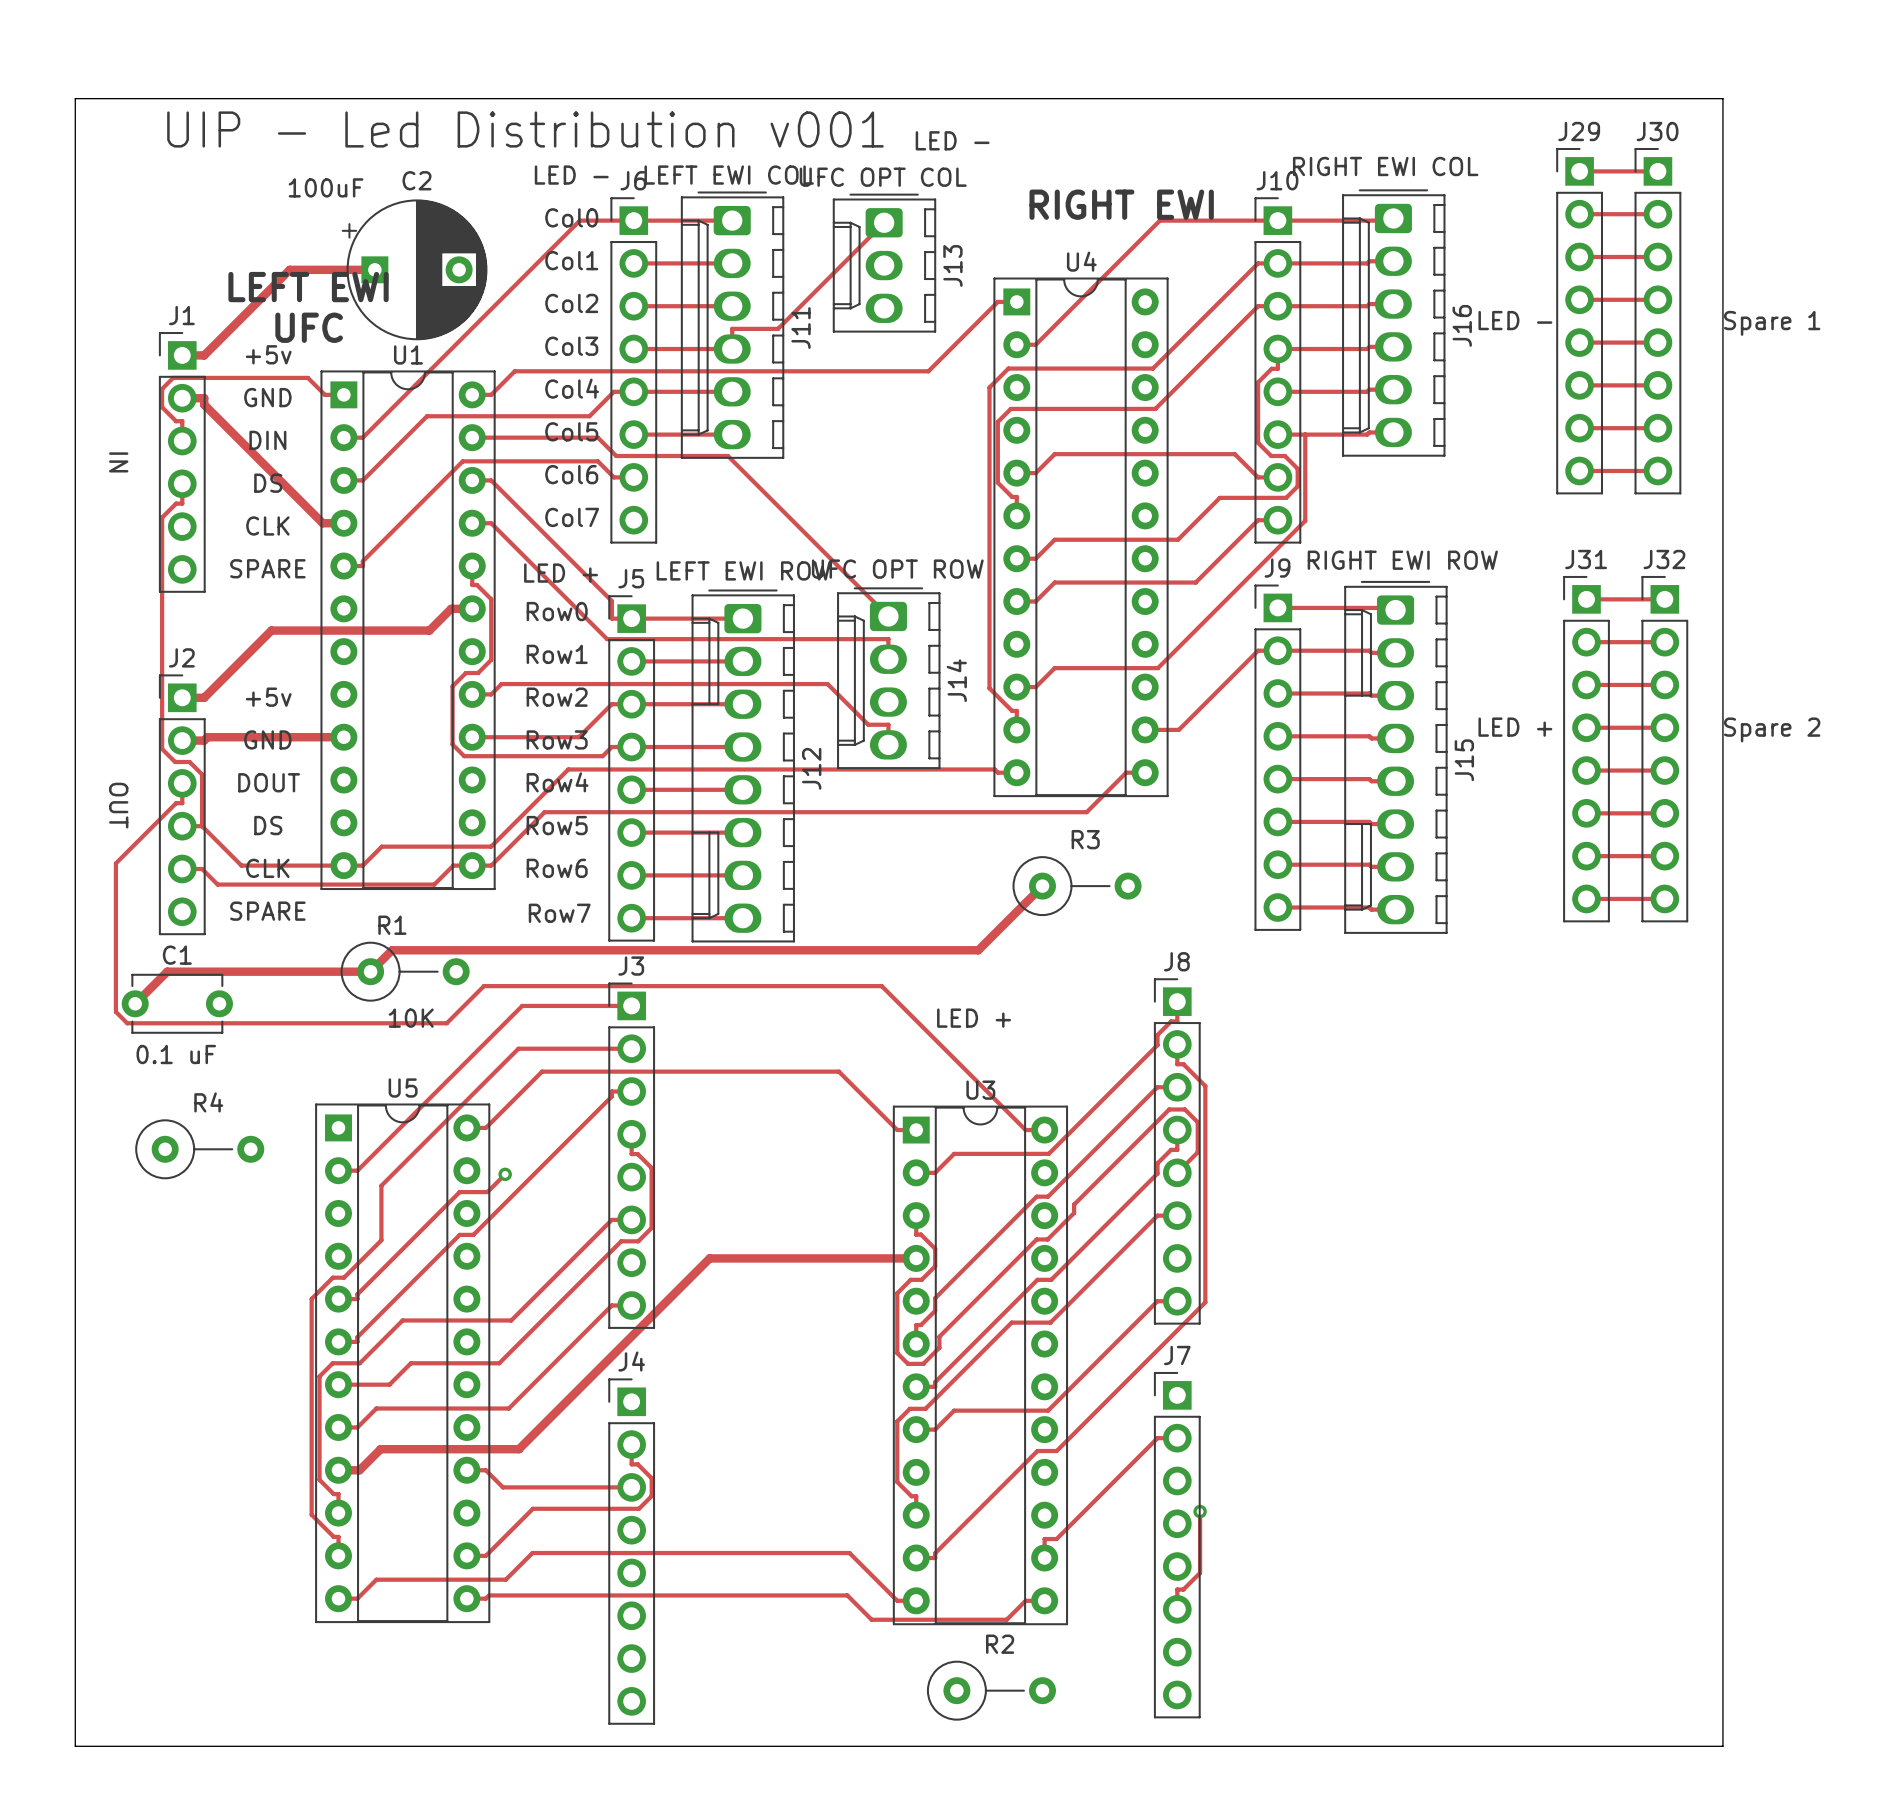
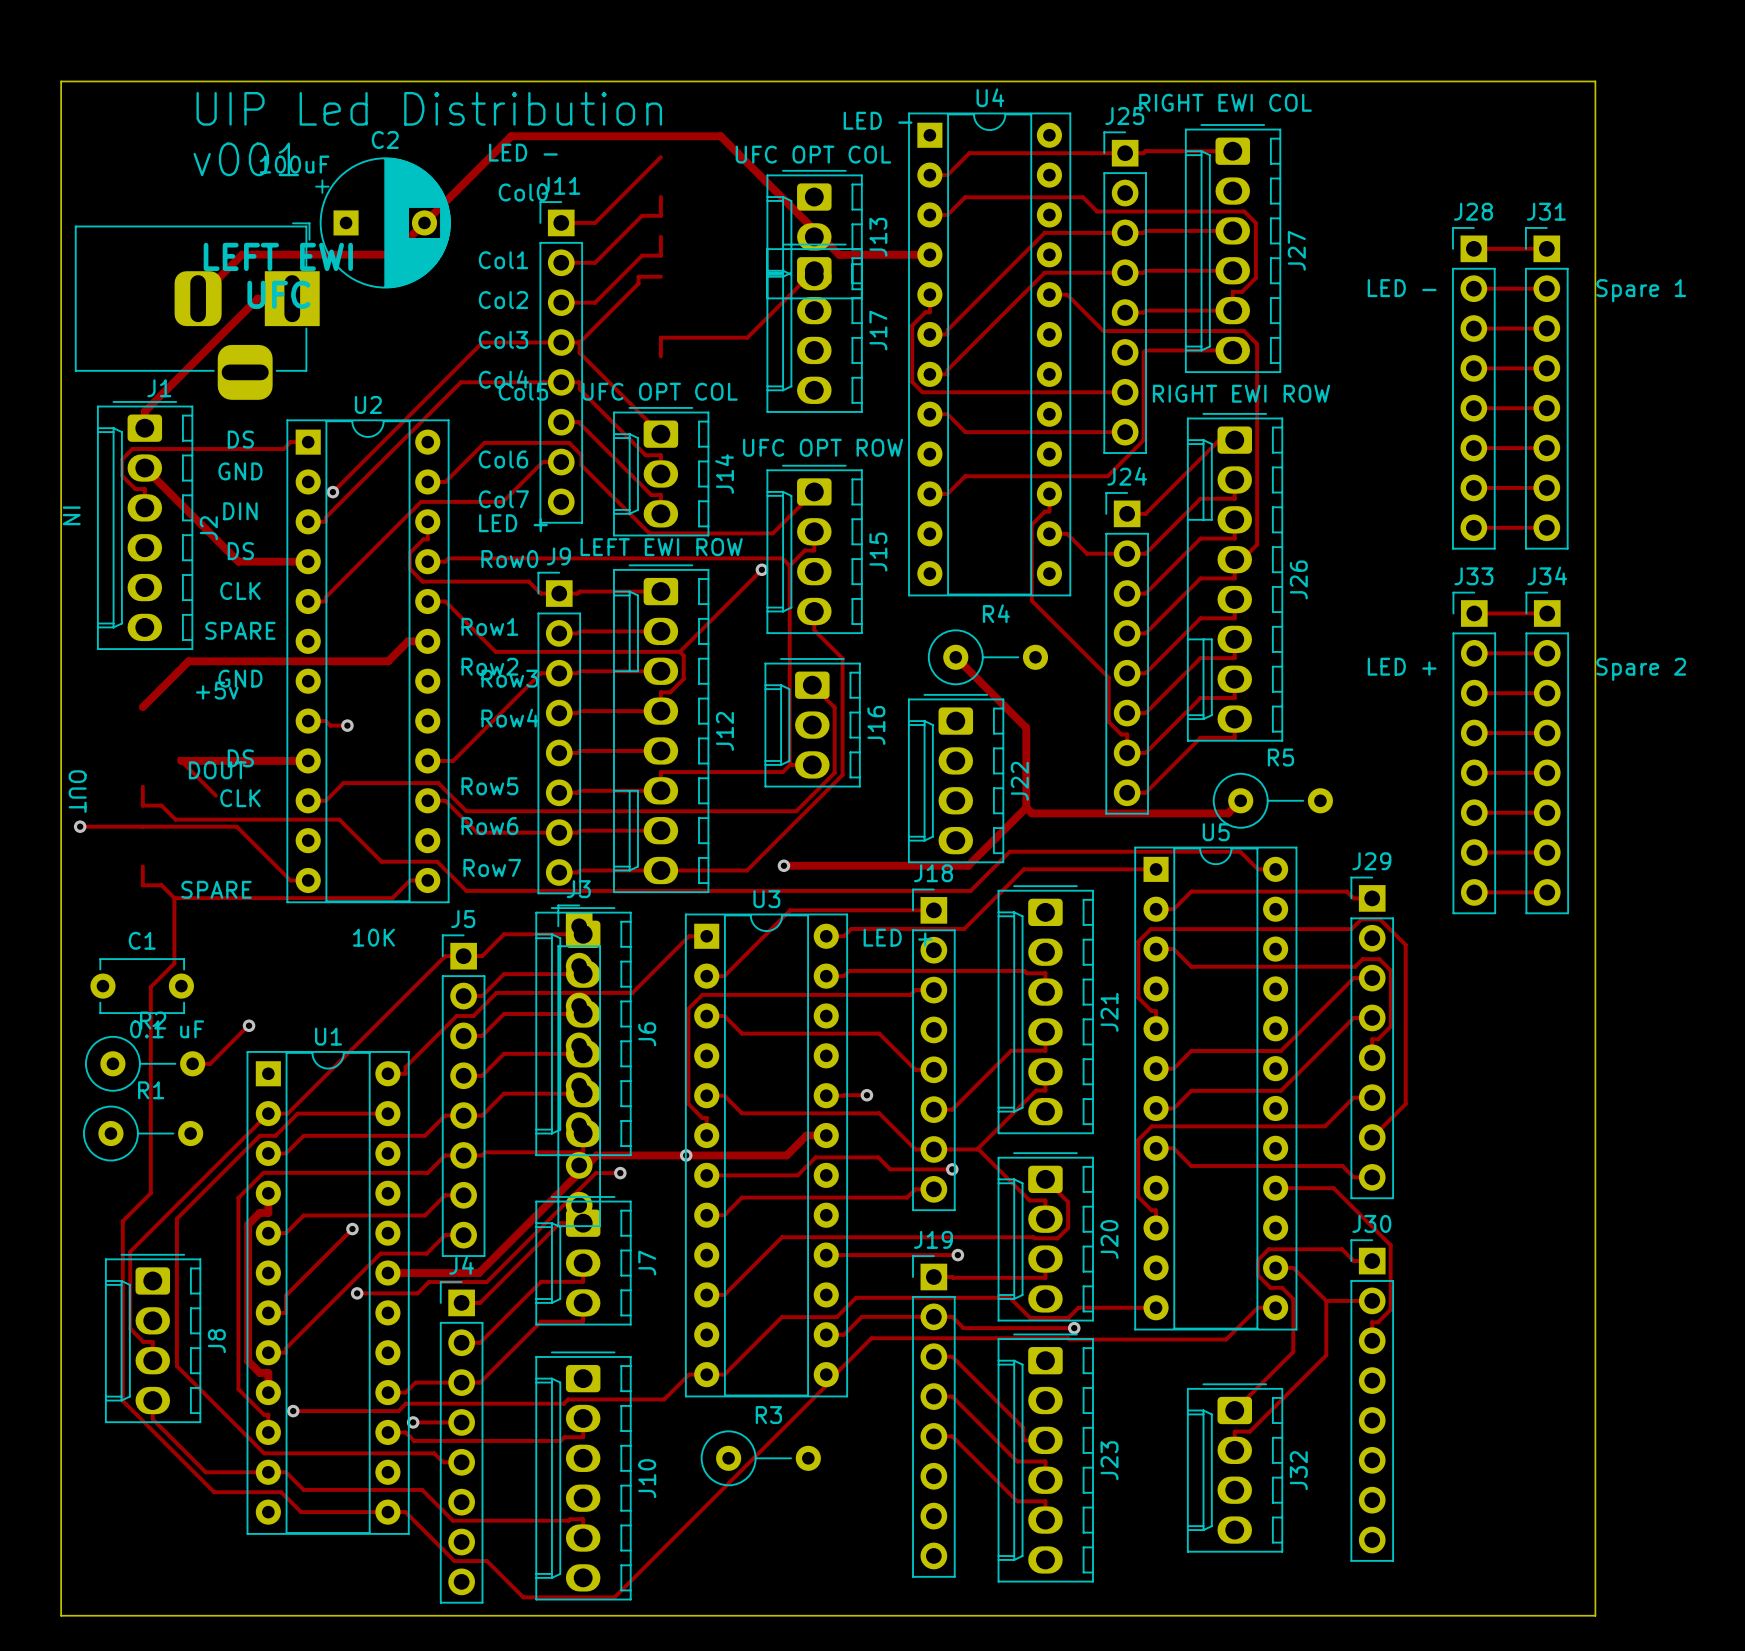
text: UIP - Led Distribution v001 (525, 129) -> UIP Led Distribution (429, 108)
J16 value: RIGHT EWI COL (1385, 166) -> none
track: (1579, 171) (1657, 171) -> (1473, 248) (1546, 248)
track: none -> (1232, 151) (969, 153) (947, 175) (929, 175)
J11 value: LEFT EWI COL (729, 175) -> none
track: none -> (660, 157) (595, 222) (561, 222)
J6 name position: J6 (633, 180) -> J6 (647, 1034)
J10 name position: J10 (1277, 180) -> J10 (647, 1478)
text: none -> v001 (246, 159)
J16 footprint: [1342, 189, 1446, 457] -> [764, 658, 861, 788]
J11 footprint: [680, 191, 785, 459] -> [539, 201, 584, 524]
J6 footprint: [610, 197, 658, 544] -> [535, 907, 632, 1157]
J10 footprint: [1254, 197, 1302, 544] -> [535, 1351, 632, 1601]
text: RIGHT EWI (1121, 204) -> none
track: (1579, 214) (1657, 214) -> (1473, 288) (1546, 288)
track: (1393, 218) (1391, 220) (1159, 220) (1035, 344) (1016, 344) -> none
track: (732, 220) (579, 220) (362, 437) (343, 437) -> none
track: none -> (660, 197) (660, 215) (642, 215) (595, 262) (561, 262)
track: (884, 222) (778, 328) (732, 328) (732, 349) (633, 349) -> none
track: none -> (929, 214) (947, 214) (965, 197) (1082, 197) (1097, 211) (1244, 211) (1255, 223) (1255, 278) (1242, 291) (1232, 291) (1232, 310) (1145, 310) (1143, 312) (1125, 312)
track: (1579, 256) (1657, 256) -> (1473, 328) (1546, 328)
track: none -> (1232, 230) (1044, 232) (947, 330) (947, 334) (929, 334)
text position: Col1 (571, 260) -> Col1 (503, 260)
track: (1393, 261) (1369, 261) (1367, 263) (1258, 263) (1152, 368) (1008, 368) (989, 387) (989, 688) (1012, 710) (1016, 710) (1016, 729) -> none
track: (633, 263) (732, 263) -> none
track: none -> (660, 236) (660, 255) (642, 255) (595, 302) (561, 302)
track: (374, 269) (289, 269) (204, 355) (182, 355) -> none
C2 position: (414, 269) -> (383, 222)
J27: none -> RIGHT EWI COL (1233, 248)
track: none -> (929, 254) (839, 254) (720, 136) (511, 136) (392, 254) (242, 254) (198, 298)
track: (1579, 299) (1657, 299) -> (1473, 368) (1546, 368)
track: none -> (814, 270) (747, 337) (660, 337) (660, 356)
track: (1016, 301) (997, 301) (928, 371) (514, 371) (491, 394) (472, 394) -> none
track: none -> (1232, 270) (1044, 272) (947, 369) (947, 374) (929, 374)
text position: Col2 (571, 303) -> Col2 (503, 300)
track: (1393, 304) (1369, 304) (1367, 306) (1258, 306) (1155, 408) (1010, 408) (997, 421) (997, 482) (1012, 496) (1016, 496) (1016, 515) -> none
track: (633, 306) (732, 306) -> none
track: none -> (660, 276) (638, 276) (638, 283) (579, 342) (482, 342) (332, 492)
J1 name position: J1 (181, 315) -> J1 (159, 388)
J29 position: (1579, 321) -> (1372, 1037)
J30 position: (1657, 321) -> (1372, 1400)
J25: none -> (1125, 292)
track: none -> (929, 294) (929, 312) (925, 312) (912, 325) (912, 381) (922, 392) (1125, 392)
track: none -> (1049, 294) (1067, 294) (1103, 331) (1244, 331) (1257, 344) (1257, 544) (1234, 567)
J11 name position: J11 (801, 328) -> J11 (560, 185)
track: none -> (292, 298) (257, 298) (144, 411) (144, 428)
J1 footprint: [158, 332, 206, 593] -> [74, 222, 320, 400]
track: (1579, 342) (1657, 342) -> (1473, 408) (1546, 408)
text position: Col3 (571, 346) -> Col3 (503, 339)
track: (1393, 346) (1369, 346) (1367, 349) (1277, 349) (1277, 368) (1271, 368) (1258, 382) (1258, 442) (1271, 456) (1284, 456) (1297, 468) (1297, 486) (1286, 497) (1219, 497) (1177, 539) (1054, 539) (1035, 558) (1016, 558) -> none
text: +5v (268, 354) -> none
J17: none -> (814, 328)
track: none -> (579, 342) (579, 352) (660, 434)
track: (1579, 385) (1657, 385) -> (1473, 448) (1546, 448)
track: none -> (1232, 350) (1145, 350) (1143, 352) (1143, 440) (1107, 476) (965, 476) (947, 493) (929, 493)
text position: Col4 (572, 388) -> Col4 (503, 379)
track: (1393, 389) (1369, 389) (1367, 391) (1277, 391) -> none
track: (732, 391) (613, 391) (589, 416) (427, 416) (362, 480) (343, 480) -> none
track: (343, 394) (324, 394) (307, 377) (173, 377) (162, 389) (162, 407) (176, 421) (182, 421) (182, 441) -> none
text position: GND (267, 397) -> GND (240, 471)
track: (182, 398) (204, 398) (204, 404) (322, 523) (343, 523) -> none
track: (1579, 428) (1657, 428) -> (1473, 487) (1546, 487)
J28: none -> (1473, 388)
track: (1393, 432) (1369, 432) (1367, 434) (1277, 434) -> none
track: (633, 434) (732, 434) -> none
track: (1305, 434) (1305, 520) (1157, 668) (1054, 668) (1035, 687) (1016, 687) -> none
track: (472, 437) (597, 437) (616, 456) (727, 456) (888, 616) -> none
text position: DIN (267, 440) -> DIN (240, 511)
track: none -> (929, 414) (947, 414) (965, 432) (1125, 432)
text position: IN (118, 462) -> IN (71, 515)
track: none -> (561, 422) (579, 422) (651, 495) (660, 495) (660, 513)
track: (1579, 470) (1657, 470) -> (1473, 527) (1546, 527)
track: (1016, 473) (1035, 473) (1054, 454) (1234, 454) (1258, 477) (1277, 477) -> none
text position: Col6 (571, 474) -> Col6 (503, 459)
track: (633, 477) (613, 477) (597, 461) (462, 461) (362, 561) (362, 566) (343, 566) -> none
track: (472, 480) (491, 480) (611, 601) (611, 618) (742, 618) -> none
track: (182, 483) (182, 503) (176, 503) (162, 517) (162, 749) (175, 761) (189, 761) (202, 774) (202, 826) (182, 826) -> none
track: none -> (1234, 440) (1219, 440) (1145, 513) (1127, 513)
track: none -> (308, 442) (290, 442) (283, 449) (132, 449) (122, 459) (122, 475) (135, 489) (144, 489) (144, 507)
track: none -> (561, 462) (542, 462) (502, 501) (421, 501) (325, 597) (325, 601) (308, 601)
track: none -> (144, 468) (238, 561) (308, 561)
text position: Col7 (572, 517) -> Col7 (503, 499)
track: none -> (660, 474) (660, 455) (645, 455) (579, 389) (579, 382) (460, 382) (325, 517) (325, 521) (308, 521)
track: (1277, 520) (1258, 520) (1195, 582) (1054, 582) (1035, 601) (1016, 601) -> none
track: (472, 523) (491, 523) (607, 639) (888, 639) (888, 659) -> none
text position: CLK (267, 525) -> CLK (240, 590)
track: none -> (1234, 479) (1234, 498) (1200, 498) (1145, 553) (1087, 553) (1067, 533) (1049, 533)
track: none -> (427, 481) (445, 481) (484, 442) (569, 442) (581, 455) (581, 465) (649, 533) (772, 533) (814, 491)
U4 position: (1081, 537) -> (989, 354)
via: none -> (332, 492)
track: none -> (1049, 493) (1049, 511) (1045, 511) (1031, 524) (1031, 600) (1108, 677) (1108, 721) (1121, 734) (1127, 734) (1127, 752) (1145, 752) (1200, 697) (1234, 697) (1234, 679)
J32 name position: J32 (1664, 559) -> J32 (1298, 1470)
J15 value: RIGHT EWI ROW (1402, 560) -> UFC OPT ROW (823, 447)
track: (472, 566) (472, 585) (477, 585) (491, 599) (491, 659) (478, 673) (465, 673) (452, 686) (452, 744) (464, 756) (602, 756) (611, 747) (742, 747) -> none
text: SPARE (267, 568) -> none
J14 value: UFC OPT ROW (897, 569) -> UFC OPT COL (660, 391)
track: none -> (1234, 519) (1234, 538) (1200, 538) (1145, 593) (1127, 593)
track: none -> (427, 521) (427, 539) (423, 539) (409, 552) (409, 568) (422, 581) (528, 581) (540, 593) (660, 591)
J32 footprint: [1641, 575, 1689, 923] -> [1186, 1383, 1284, 1553]
J15 footprint: [1344, 580, 1448, 934] -> [766, 464, 863, 635]
track: none -> (814, 531) (814, 550) (804, 550) (789, 565)
J14 footprint: [837, 587, 941, 770] -> [613, 407, 710, 537]
track: (1586, 599) (1664, 599) -> (1474, 613) (1547, 613)
text: none -> DS (240, 551)
track: (1277, 607) (1393, 607) (1395, 610) -> none
track: (472, 608) (451, 608) (429, 630) (271, 630) (204, 697) (182, 697) -> none
track: none -> (1234, 559) (1234, 578) (1200, 578) (1145, 633) (1127, 633)
track: none -> (427, 561) (445, 561) (448, 558) (782, 558) (789, 565)
track: none -> (789, 565) (789, 762) (791, 764)
track: none -> (761, 569) (679, 651)
via: none -> (761, 569)
U1 position: (408, 630) -> (328, 1292)
J26: none -> RIGHT EWI ROW (1235, 577)
track: (1586, 642) (1664, 642) -> (1474, 653) (1547, 653)
track: (1395, 652) (1371, 652) (1369, 650) (1258, 650) (1178, 729) (1145, 729) -> none
text position: Row1 (557, 654) -> Row1 (489, 626)
track: none -> (1234, 599) (1234, 618) (1200, 618) (1145, 673) (1127, 673)
J2 name position: J2 (181, 657) -> J2 (208, 528)
track: none -> (427, 601) (445, 601) (495, 651) (679, 651)
track: (631, 661) (742, 661) -> none
track: none -> (814, 611) (814, 630) (842, 658) (842, 774) (746, 870) (579, 870) (577, 872) (559, 872)
J2 footprint: [158, 674, 206, 936] -> [96, 401, 194, 651]
track: (1586, 684) (1664, 684) -> (1474, 693) (1547, 693)
text: none -> SPARE (240, 630)
track: none -> (660, 631) (579, 631) (577, 633) (559, 633)
track: (1277, 693) (1369, 693) (1371, 695) (1395, 695) -> none
track: (472, 694) (491, 694) (501, 684) (827, 684) (868, 724) (888, 724) (888, 744) -> none
text position: +5v (268, 697) -> +5v (217, 690)
text position: Row2 (557, 697) -> Row2 (489, 666)
track: none -> (1234, 639) (1234, 658) (1200, 658) (1145, 713) (1127, 713)
track: none -> (427, 641) (408, 641) (388, 661) (188, 661) (142, 707)
track: (742, 704) (611, 704) (578, 737) (472, 737) -> none
track: none -> (679, 651) (683, 655) (683, 678) (670, 692) (660, 692) (660, 711) (579, 711) (577, 713) (559, 713)
J24: none -> (1127, 653)
track: none -> (955, 657) (1026, 727) (1026, 807)
U2: none -> (367, 661)
track: (1586, 727) (1664, 727) -> (1474, 733) (1547, 733)
track: none -> (660, 671) (540, 673) (453, 760) (427, 760)
track: (1277, 736) (1369, 736) (1371, 738) (1395, 738) -> none
track: (343, 737) (207, 737) (204, 740) (182, 740) -> none
track: none -> (812, 685) (834, 707) (834, 772) (796, 811) (466, 811) (438, 783) (343, 783) (325, 800) (308, 800)
J31 position: (1586, 749) -> (1546, 388)
J9 position: (1277, 757) -> (559, 733)
J12 position: (743, 765) -> (661, 728)
J5 position: (631, 768) -> (463, 1095)
track: (1586, 770) (1664, 770) -> (1474, 772) (1547, 772)
track: (1016, 772) (997, 772) (994, 769) (568, 769) (491, 846) (381, 846) (362, 865) (241, 865) -> none
track: (1145, 772) (1126, 772) (1086, 812) (544, 812) (491, 865) (453, 865) (434, 884) (217, 884) (202, 868) (182, 868) -> none
track: (1277, 779) (1369, 779) (1371, 781) (1395, 781) -> none
text position: DOUT (269, 782) -> DOUT (217, 770)
track: (182, 783) (182, 803) (176, 803) (115, 863) (115, 1011) (127, 1023) (446, 1023) (483, 986) (881, 986) (1025, 1130) (1044, 1130) -> none
track: none -> (1234, 719) (1234, 737) (1200, 737) (1145, 792) (1127, 792)
track: none -> (308, 721) (325, 721) (330, 725) (347, 725)
track: (631, 789) (742, 789) -> none
via: none -> (347, 725)
text position: OUT (118, 805) -> OUT (77, 791)
track: (1586, 813) (1664, 813) -> (1474, 812) (1547, 812)
track: none -> (660, 750) (579, 750) (577, 752) (559, 752)
J33: none -> (1474, 752)
J34: none -> (1547, 752)
track: (1277, 821) (1369, 821) (1371, 824) (1395, 824) -> none
text position: Row5 (557, 825) -> Row5 (489, 786)
track: none -> (181, 760) (308, 760)
track: (631, 832) (742, 832) -> none
track: none -> (812, 764) (789, 764) (782, 772) (660, 772) (660, 790) (579, 790) (577, 792) (559, 792)
J22: none -> (956, 778)
track: none -> (142, 786) (142, 805) (161, 805) (175, 819) (339, 819) (381, 861) (437, 861) (466, 890) (970, 890) (1009, 851) (1240, 851) (1257, 869) (1275, 869)
track: (1586, 856) (1664, 856) -> (1474, 852) (1547, 852)
track: (1277, 864) (1369, 864) (1371, 866) (1395, 866) -> none
text position: Row6 (557, 868) -> Row6 (489, 826)
track: none -> (427, 800) (445, 800) (477, 832) (660, 830)
track: none -> (1240, 800) (1228, 813) (1031, 813) (1026, 807)
R5: none -> (1272, 800)
track: (631, 875) (742, 875) -> none
track: none -> (1026, 807) (968, 865) (783, 865)
track: (1042, 886) (978, 950) (392, 950) (370, 971) (167, 971) (135, 1003) -> none
R3 position: (1077, 886) -> (760, 1458)
track: none -> (80, 826) (236, 826) (290, 880) (308, 880)
via: none -> (80, 826)
track: (1586, 898) (1664, 898) -> (1474, 892) (1547, 892)
track: (1277, 907) (1369, 907) (1371, 909) (1395, 909) -> none
text position: SPARE (267, 911) -> SPARE (216, 889)
text position: Row7 (559, 913) -> Row7 (492, 867)
track: (631, 918) (742, 918) -> none
R1 name position: R1 (392, 925) -> R1 (151, 1090)
via: none -> (783, 865)
track: none -> (142, 866) (142, 885) (161, 885) (174, 898)
track: none -> (1156, 869) (1023, 869) (964, 928) (851, 928) (843, 936) (826, 936)
track: none -> (427, 880) (410, 880) (392, 898) (174, 898)
J8 name position: J8 (1176, 961) -> J8 (216, 1341)
R1 position: (405, 971) -> (143, 1133)
track: none -> (174, 898) (174, 963) (150, 987) (150, 1193) (122, 1221) (122, 1400) (214, 1492) (281, 1492) (301, 1512) (405, 1512) (454, 1561) (487, 1561) (523, 1597) (614, 1597) (871, 1338) (1226, 1339) (1257, 1307) (1275, 1307)
track: none -> (1372, 898) (1353, 898) (1346, 891) (1191, 891) (1173, 909) (1156, 909)
J8 footprint: [1153, 978, 1201, 1325] -> [104, 1253, 202, 1424]
track: none -> (933, 910) (790, 910) (724, 976) (706, 976)
track: (1177, 1001) (1177, 1021) (1171, 1021) (1157, 1035) (1157, 1045) (1048, 1153) (954, 1153) (935, 1172) (916, 1172) -> none
C1 position: (177, 1003) -> (142, 986)
track: (631, 1005) (522, 1005) (357, 1170) (338, 1170) -> none
track: none -> (583, 934) (503, 934) (482, 956) (445, 956) (287, 1113) (268, 1113) (130, 1251) (130, 1328) (143, 1341) (152, 1341) (152, 1360)
track: none -> (706, 936) (689, 936) (632, 992) (496, 992) (473, 1015) (456, 1015) (405, 1067) (405, 1073) (387, 1073)
track: none -> (1156, 949) (1173, 949) (1191, 966) (1355, 966) (1362, 959) (1379, 959) (1390, 970) (1390, 1026) (1377, 1039) (1372, 1039) (1372, 1057)
track: (1177, 1044) (1177, 1064) (1183, 1064) (1205, 1086) (1205, 1302) (1056, 1451) (1037, 1451) (935, 1553) (935, 1558) (916, 1558) -> none
track: (631, 1048) (518, 1048) (381, 1185) (381, 1240) (344, 1277) (332, 1277) (311, 1298) (311, 1514) (333, 1536) (338, 1536) (338, 1555) -> none
text position: 0.1 uF (176, 1054) -> 0.1 uF (167, 1029)
track: none -> (583, 974) (503, 974) (482, 996) (463, 996)
track: none -> (826, 976) (843, 976) (849, 970) (1024, 970) (1026, 973) (1045, 973) (1045, 992)
track: none -> (1372, 978) (1353, 978) (1280, 1050) (1191, 1050) (1173, 1068) (1156, 1068)
track: none -> (933, 990) (915, 990) (910, 994) (702, 994) (688, 1008) (688, 1103) (702, 1117) (706, 1117) (706, 1135)
track: (1177, 1087) (1157, 1087) (1048, 1196) (1036, 1196) (935, 1298) (935, 1310) (920, 1325) (916, 1325) (916, 1344) -> none
track: (631, 1091) (611, 1091) (611, 1096) (473, 1234) (459, 1234) (357, 1337) (357, 1341) (338, 1341) -> none
J21: none -> (1045, 1009)
track: none -> (583, 1013) (503, 1013) (482, 1035) (463, 1035)
track: none -> (706, 1015) (724, 1015) (742, 1033) (879, 1033) (915, 1069) (933, 1069)
track: none -> (1372, 1017) (1353, 1017) (1280, 1090) (1191, 1090) (1173, 1108) (1156, 1108)
track: none -> (249, 1025) (210, 1063) (192, 1063)
via: none -> (249, 1025)
track: none -> (1156, 1028) (1156, 1011) (1151, 1011) (1138, 997) (1138, 941) (1150, 929) (1351, 929) (1361, 919) (1380, 919) (1405, 944) (1405, 1104) (1372, 1137)
track: none -> (1045, 1031) (1045, 1050) (1011, 1050) (952, 1109) (933, 1109)
track: (466, 1127) (485, 1127) (542, 1071) (838, 1071) (897, 1130) (916, 1130) -> none
track: (1177, 1130) (1177, 1149) (1171, 1149) (1157, 1163) (1157, 1173) (1051, 1279) (1037, 1279) (935, 1382) (935, 1386) (916, 1386) -> none
track: (631, 1134) (631, 1154) (637, 1154) (651, 1167) (651, 1228) (638, 1241) (621, 1241) (499, 1363) (410, 1363) (389, 1384) (338, 1384) -> none
J18: none -> (933, 1049)
track: none -> (583, 1053) (503, 1053) (482, 1075) (463, 1075)
R4 position: (199, 1149) -> (987, 657)
track: none -> (1045, 1071) (1045, 1090) (1036, 1090) (977, 1149) (915, 1149) (879, 1113) (742, 1113) (724, 1095) (706, 1095)
track: (1177, 1172) (1197, 1152) (1197, 1122) (1184, 1109) (1169, 1109) (1074, 1204) (1074, 1213) (1047, 1239) (1036, 1239) (939, 1336) (939, 1347) (923, 1363) (907, 1363) (897, 1353) (897, 1293) (910, 1279) (921, 1279) (935, 1266) (935, 1248) (920, 1234) (916, 1234) (916, 1215) -> none
track: (505, 1174) (487, 1192) (459, 1192) (357, 1294) (357, 1299) (338, 1299) -> none
via: (505, 1174) -> none
track: none -> (583, 1093) (503, 1093) (482, 1115) (445, 1115) (424, 1135) (303, 1135) (286, 1153) (268, 1153)
track: none -> (866, 1095) (826, 1095)
via: none -> (866, 1095)
track: none -> (1372, 1097) (1353, 1097) (1325, 1126) (1151, 1126) (1138, 1139) (1138, 1196) (1151, 1210) (1156, 1210) (1156, 1228)
track: none -> (387, 1113) (297, 1113) (275, 1135) (259, 1135) (176, 1218) (176, 1366) (264, 1453) (434, 1453) (443, 1462) (461, 1462)
track: (1177, 1215) (1157, 1215) (1050, 1322) (1011, 1322) (925, 1408) (909, 1408) (897, 1421) (897, 1482) (911, 1496) (916, 1496) (916, 1515) -> none
track: (631, 1219) (611, 1219) (511, 1320) (402, 1320) (359, 1363) (332, 1363) (319, 1376) (319, 1479) (333, 1494) (338, 1494) (338, 1513) -> none
track: none -> (583, 1133) (583, 1152) (485, 1152) (482, 1155) (445, 1155) (427, 1172) (263, 1172) (238, 1197) (238, 1389) (263, 1414) (268, 1414) (268, 1432)
track: none -> (826, 1135) (806, 1135) (786, 1155) (596, 1155) (478, 1273) (387, 1273)
track: none -> (977, 1148) (1029, 1200) (1045, 1200) (1045, 1219)
track: none -> (1156, 1148) (1173, 1148) (1191, 1165) (1342, 1165) (1353, 1177) (1372, 1177)
via: none -> (686, 1155)
track: (916, 1258) (709, 1258) (518, 1449) (380, 1449) (359, 1470) (338, 1470) -> none
track: none -> (952, 1169) (890, 1169) (878, 1157) (815, 1157) (797, 1175) (706, 1175)
via: none -> (952, 1169)
track: none -> (620, 1173) (595, 1173) (486, 1282) (428, 1282) (417, 1293) (357, 1293)
via: none -> (620, 1173)
track: none -> (1045, 1179) (1068, 1202) (1068, 1227) (1057, 1238) (782, 1237) (724, 1294) (706, 1294)
track: none -> (1275, 1188) (1333, 1188) (1390, 1245) (1390, 1309) (1377, 1322) (1372, 1322) (1372, 1340)
track: none -> (933, 1189) (915, 1189) (907, 1197) (742, 1197) (724, 1215) (706, 1215)
track: none -> (268, 1193) (268, 1212) (259, 1212) (248, 1224) (248, 1361) (259, 1372) (268, 1372) (268, 1392)
track: none -> (463, 1195) (445, 1195) (424, 1215) (303, 1215) (286, 1233) (268, 1233)
track: (1177, 1301) (1157, 1301) (1048, 1410) (954, 1410) (935, 1429) (916, 1429) -> none
track: (631, 1305) (611, 1305) (508, 1408) (376, 1408) (357, 1427) (338, 1427) -> none
track: none -> (583, 1223) (559, 1223) (480, 1302) (461, 1302)
track: none -> (352, 1229) (286, 1295) (286, 1312) (268, 1312)
via: none -> (352, 1229)
track: none -> (463, 1235) (445, 1235) (426, 1253) (380, 1253) (286, 1348) (286, 1352) (268, 1352)
J20: none -> (1045, 1236)
J7 name position: J7 (1177, 1355) -> J7 (647, 1263)
track: none -> (826, 1255) (957, 1255)
via: none -> (957, 1255)
U5 position: (402, 1363) -> (1215, 1088)
track: none -> (1045, 1259) (1045, 1277) (933, 1277)
U3 position: (980, 1365) -> (766, 1155)
track: none -> (1372, 1261) (1353, 1261) (1342, 1249) (1268, 1249) (1257, 1260) (1257, 1275) (1270, 1287) (1282, 1287) (1293, 1299) (1293, 1351) (1234, 1410)
track: none -> (583, 1263) (583, 1281) (541, 1281) (480, 1342) (461, 1342)
J7 footprint: [1153, 1371, 1201, 1719] -> [535, 1196, 632, 1326]
track: none -> (1275, 1267) (1293, 1267) (1326, 1300)
via: none -> (357, 1293)
track: none -> (1326, 1300) (1372, 1300)
track: none -> (1326, 1300) (1326, 1355) (1249, 1431) (1234, 1431) (1234, 1450)
track: none -> (583, 1302) (583, 1321) (541, 1321) (480, 1382) (415, 1382) (405, 1392) (387, 1392)
track: none -> (1156, 1307) (1078, 1307) (1068, 1317) (1030, 1317) (1009, 1297) (856, 1297) (836, 1317) (781, 1317) (724, 1374) (689, 1374) (664, 1399) (568, 1399) (563, 1403) (405, 1403) (398, 1411) (293, 1411)
track: none -> (1074, 1328) (963, 1328) (952, 1316) (861, 1316) (843, 1334) (826, 1334)
track: (1177, 1438) (1157, 1438) (1056, 1539) (1044, 1539) (1044, 1558) -> none
track: (631, 1444) (631, 1464) (637, 1464) (651, 1478) (651, 1496) (639, 1508) (532, 1508) (485, 1555) (466, 1555) -> none
track: none -> (933, 1356) (952, 1356) (1023, 1427) (1023, 1440) (1045, 1440)
track: (466, 1470) (485, 1470) (502, 1487) (631, 1487) -> none
track: none -> (933, 1396) (952, 1396) (1017, 1461) (1045, 1461) (1045, 1480)
track: (1200, 1511) (1200, 1572) (1183, 1589) (1177, 1589) (1177, 1609) -> none
via position: (1200, 1511) -> (1074, 1328)
track: none -> (152, 1400) (152, 1419) (205, 1472) (286, 1472) (303, 1489) (422, 1489) (453, 1520) (583, 1519) (583, 1538)
via: none -> (293, 1411)
J19: none -> (933, 1416)
track: none -> (583, 1418) (583, 1437) (564, 1437) (560, 1440) (414, 1440) (405, 1432) (387, 1432)
track: none -> (413, 1422) (461, 1422)
via: none -> (413, 1422)
J4 position: (631, 1551) -> (461, 1442)
track: none -> (933, 1436) (952, 1436) (1017, 1501) (1045, 1501) (1045, 1520)
J23: none -> (1045, 1458)
track: (338, 1598) (357, 1598) (376, 1579) (505, 1579) (532, 1553) (849, 1553) (897, 1600) (916, 1600) -> none
track: (466, 1598) (485, 1598) (489, 1595) (847, 1595) (871, 1619) (1006, 1619) (1025, 1600) (1044, 1600) -> none
R2 position: (991, 1690) -> (145, 1063)

